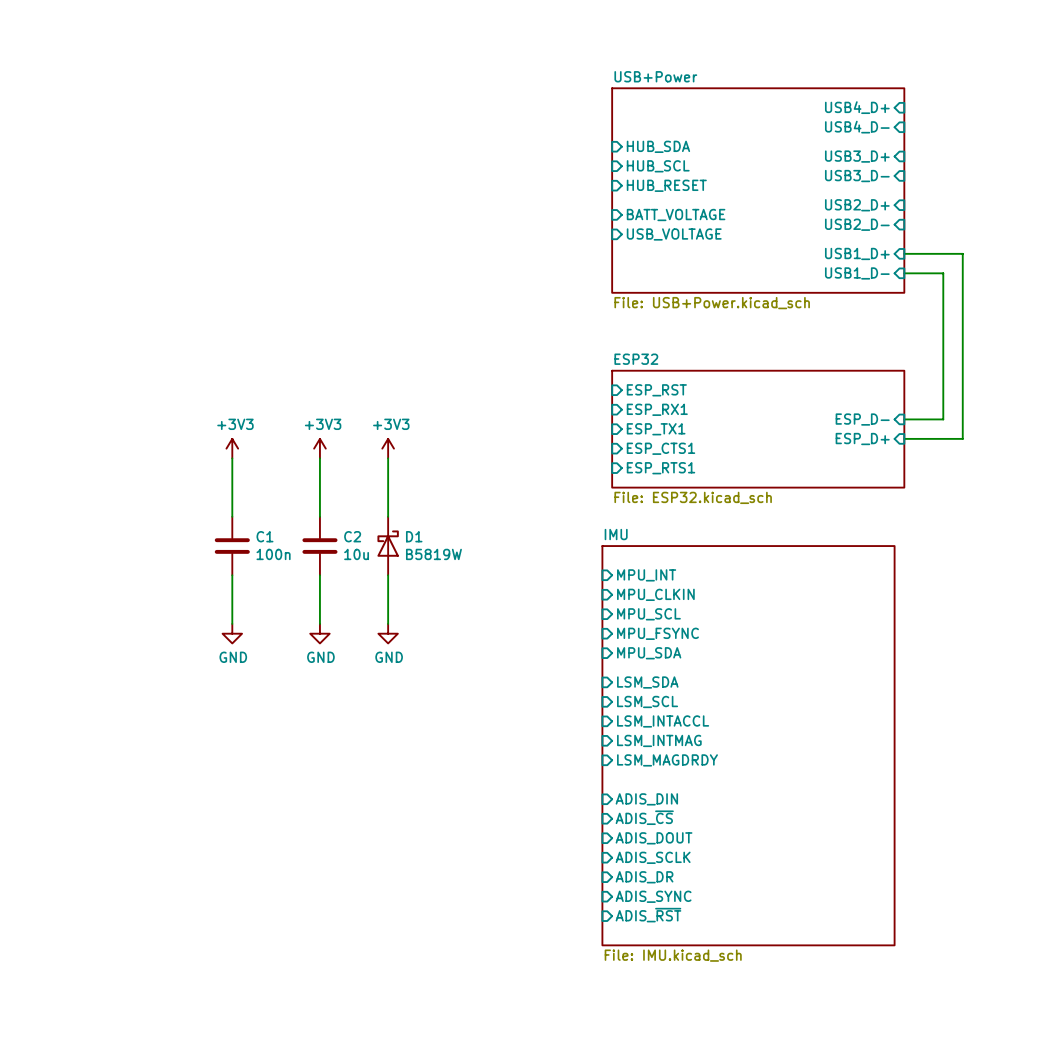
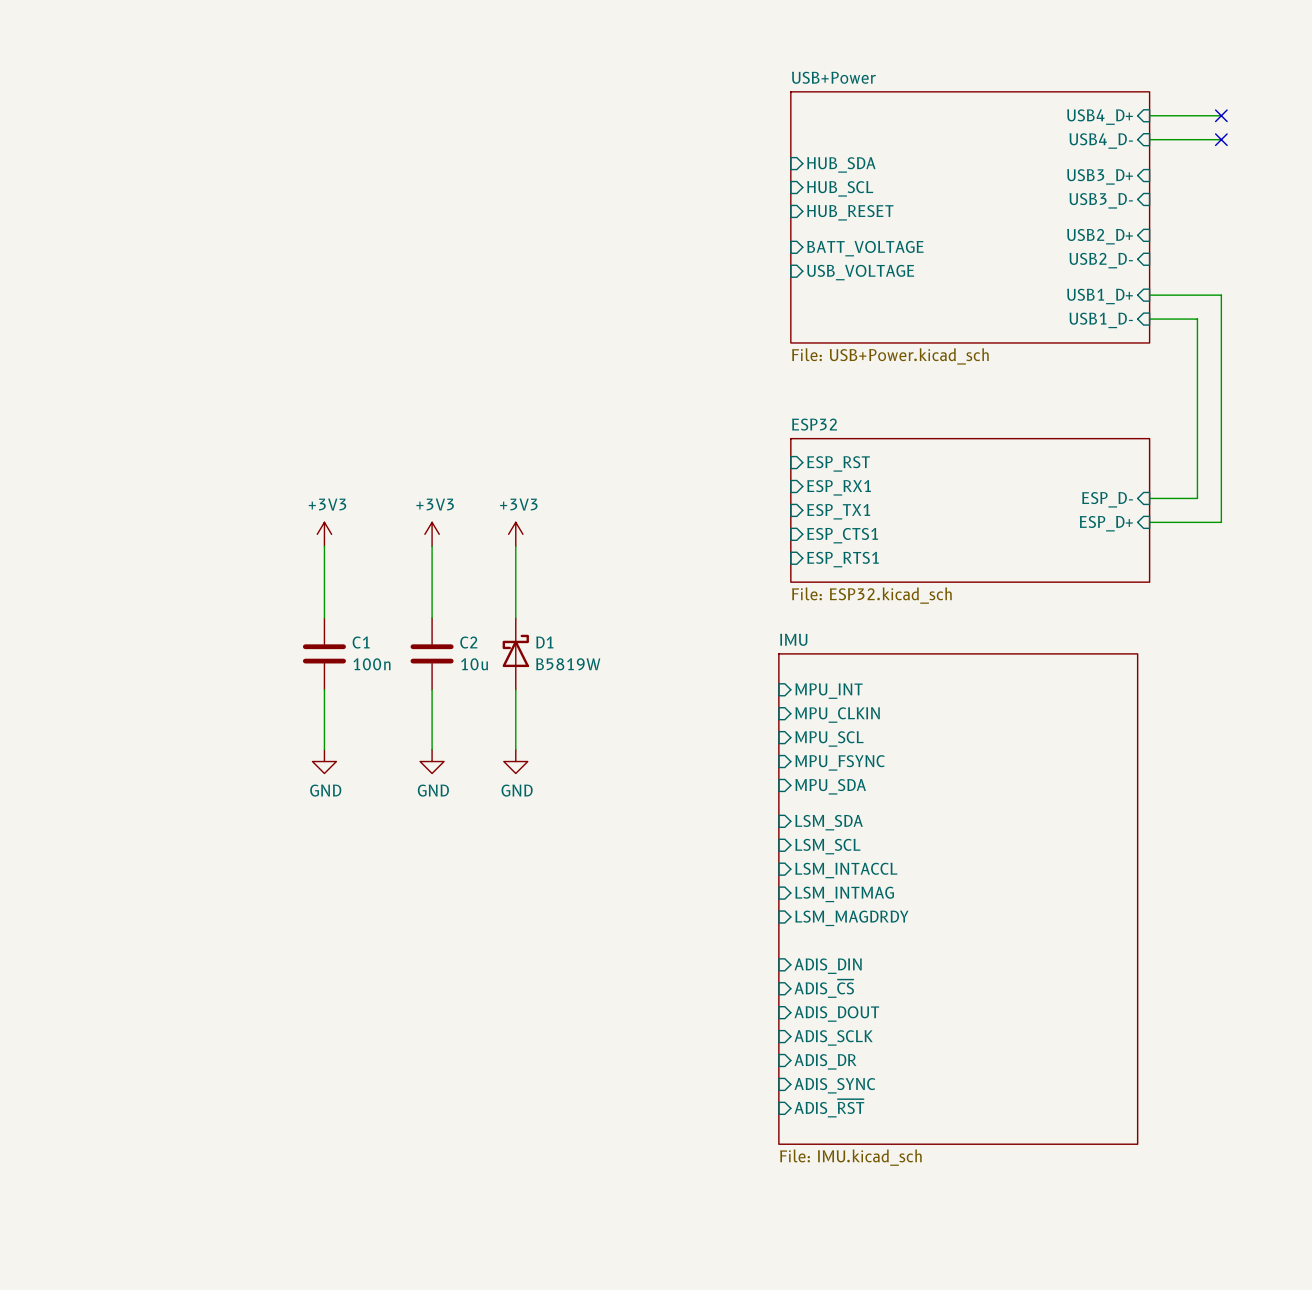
wire: none -> (1149, 115) (1221, 115)
no-connect mark: none -> (1221, 115)
wire: none -> (1149, 139) (1221, 139)
no-connect mark: none -> (1221, 139)

